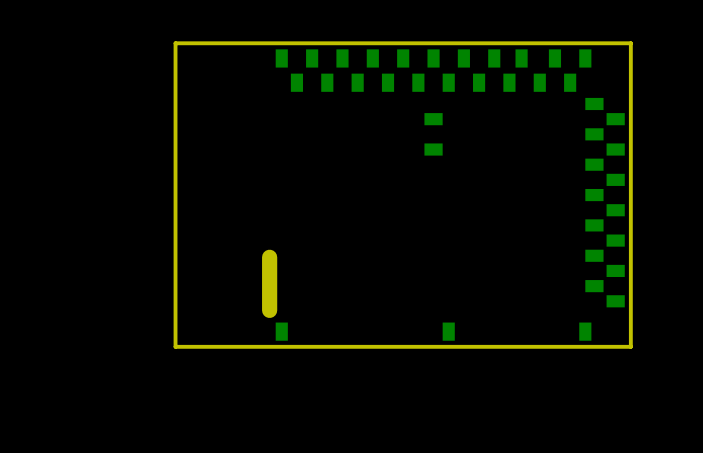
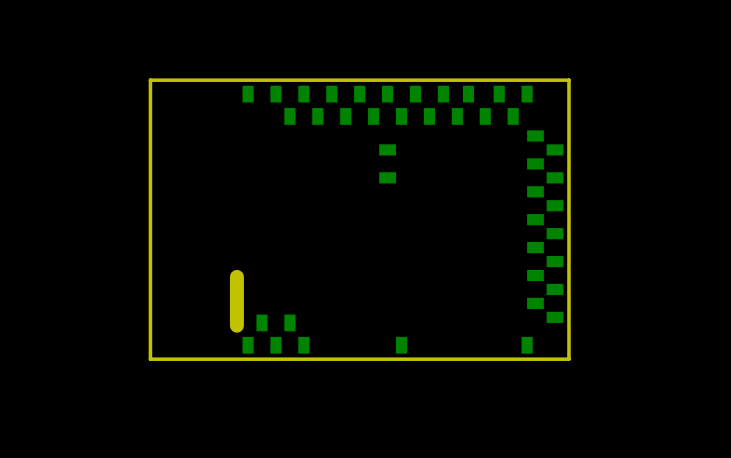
part: (296, 82) -> none
part: none -> (262, 322)
part: none -> (289, 322)
part: none -> (275, 345)
part: none -> (303, 345)

